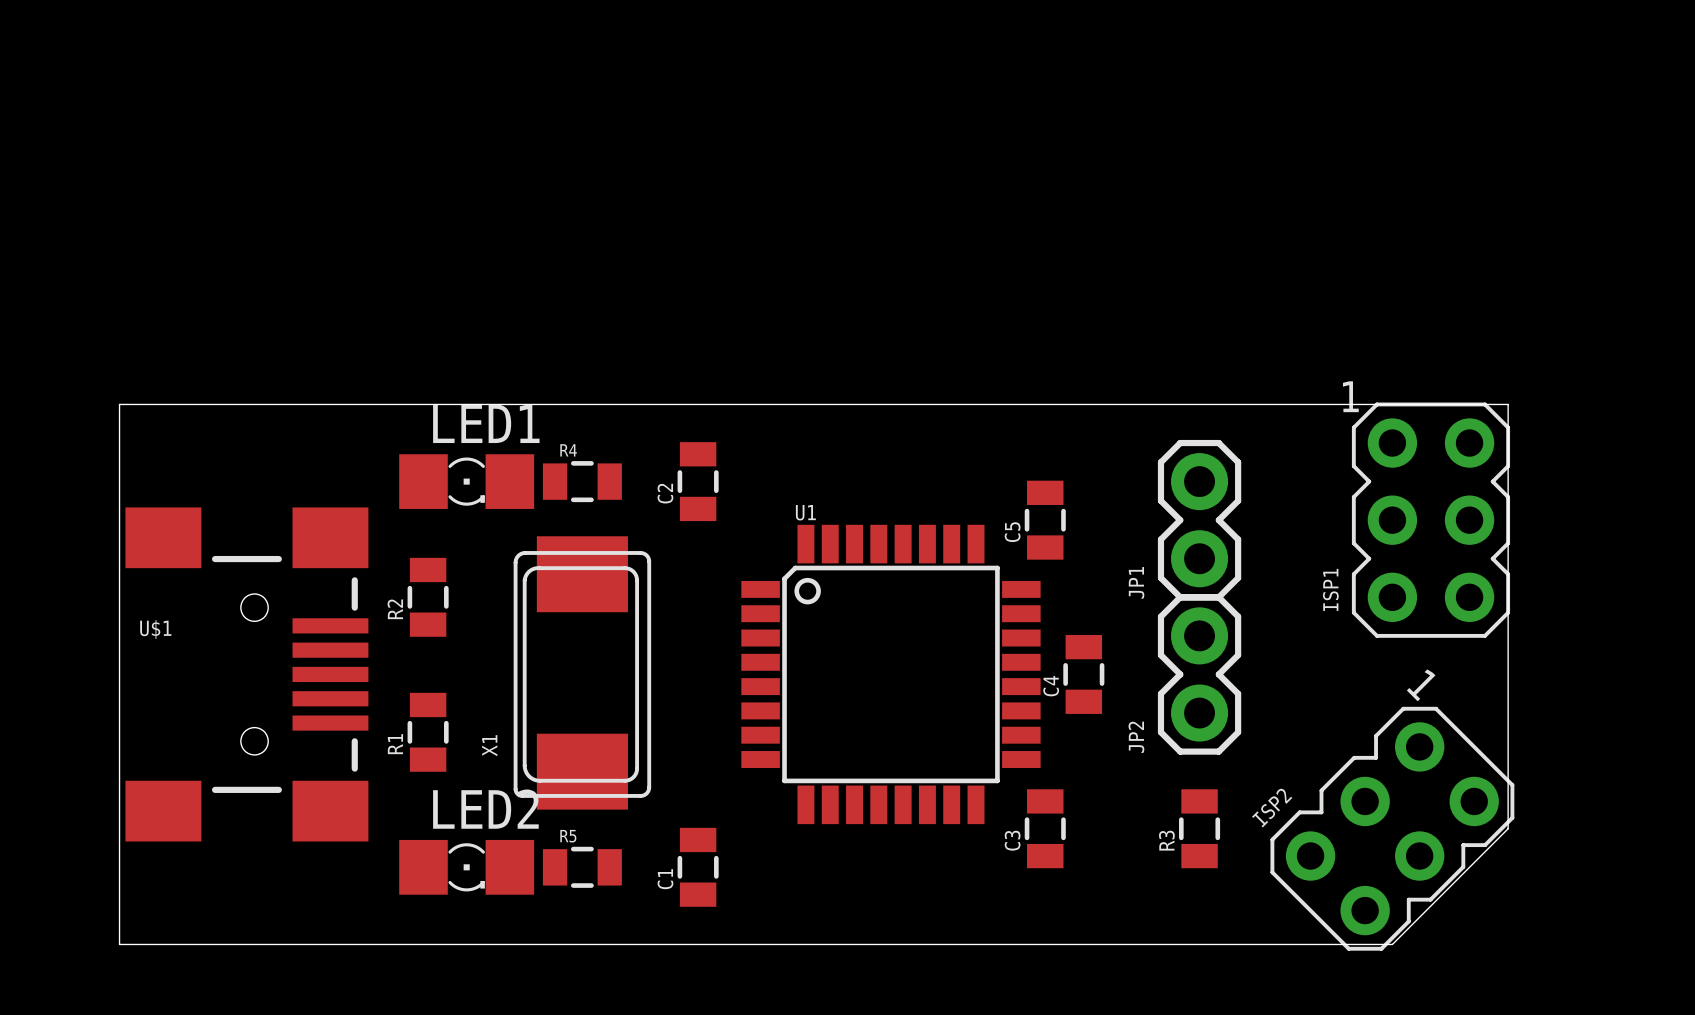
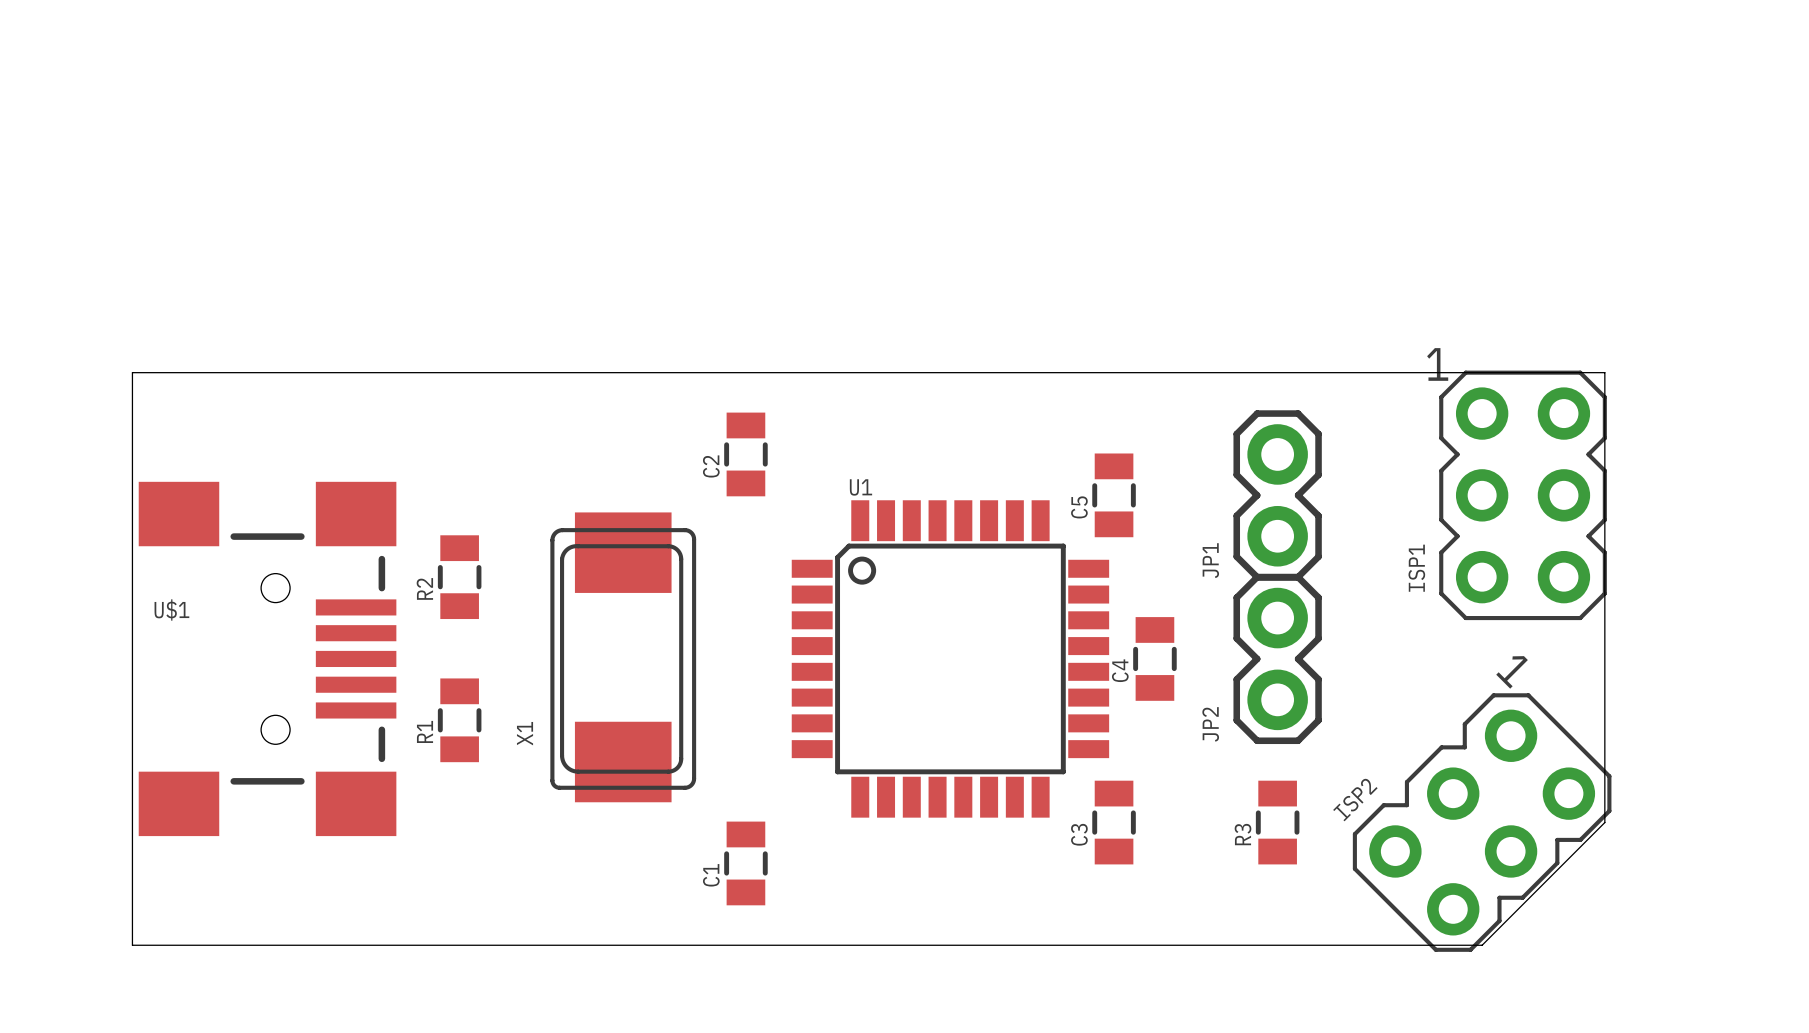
LED1: (466, 481) -> none
R4: (582, 481) -> none
LED2: (466, 867) -> none
R5: (582, 867) -> none

